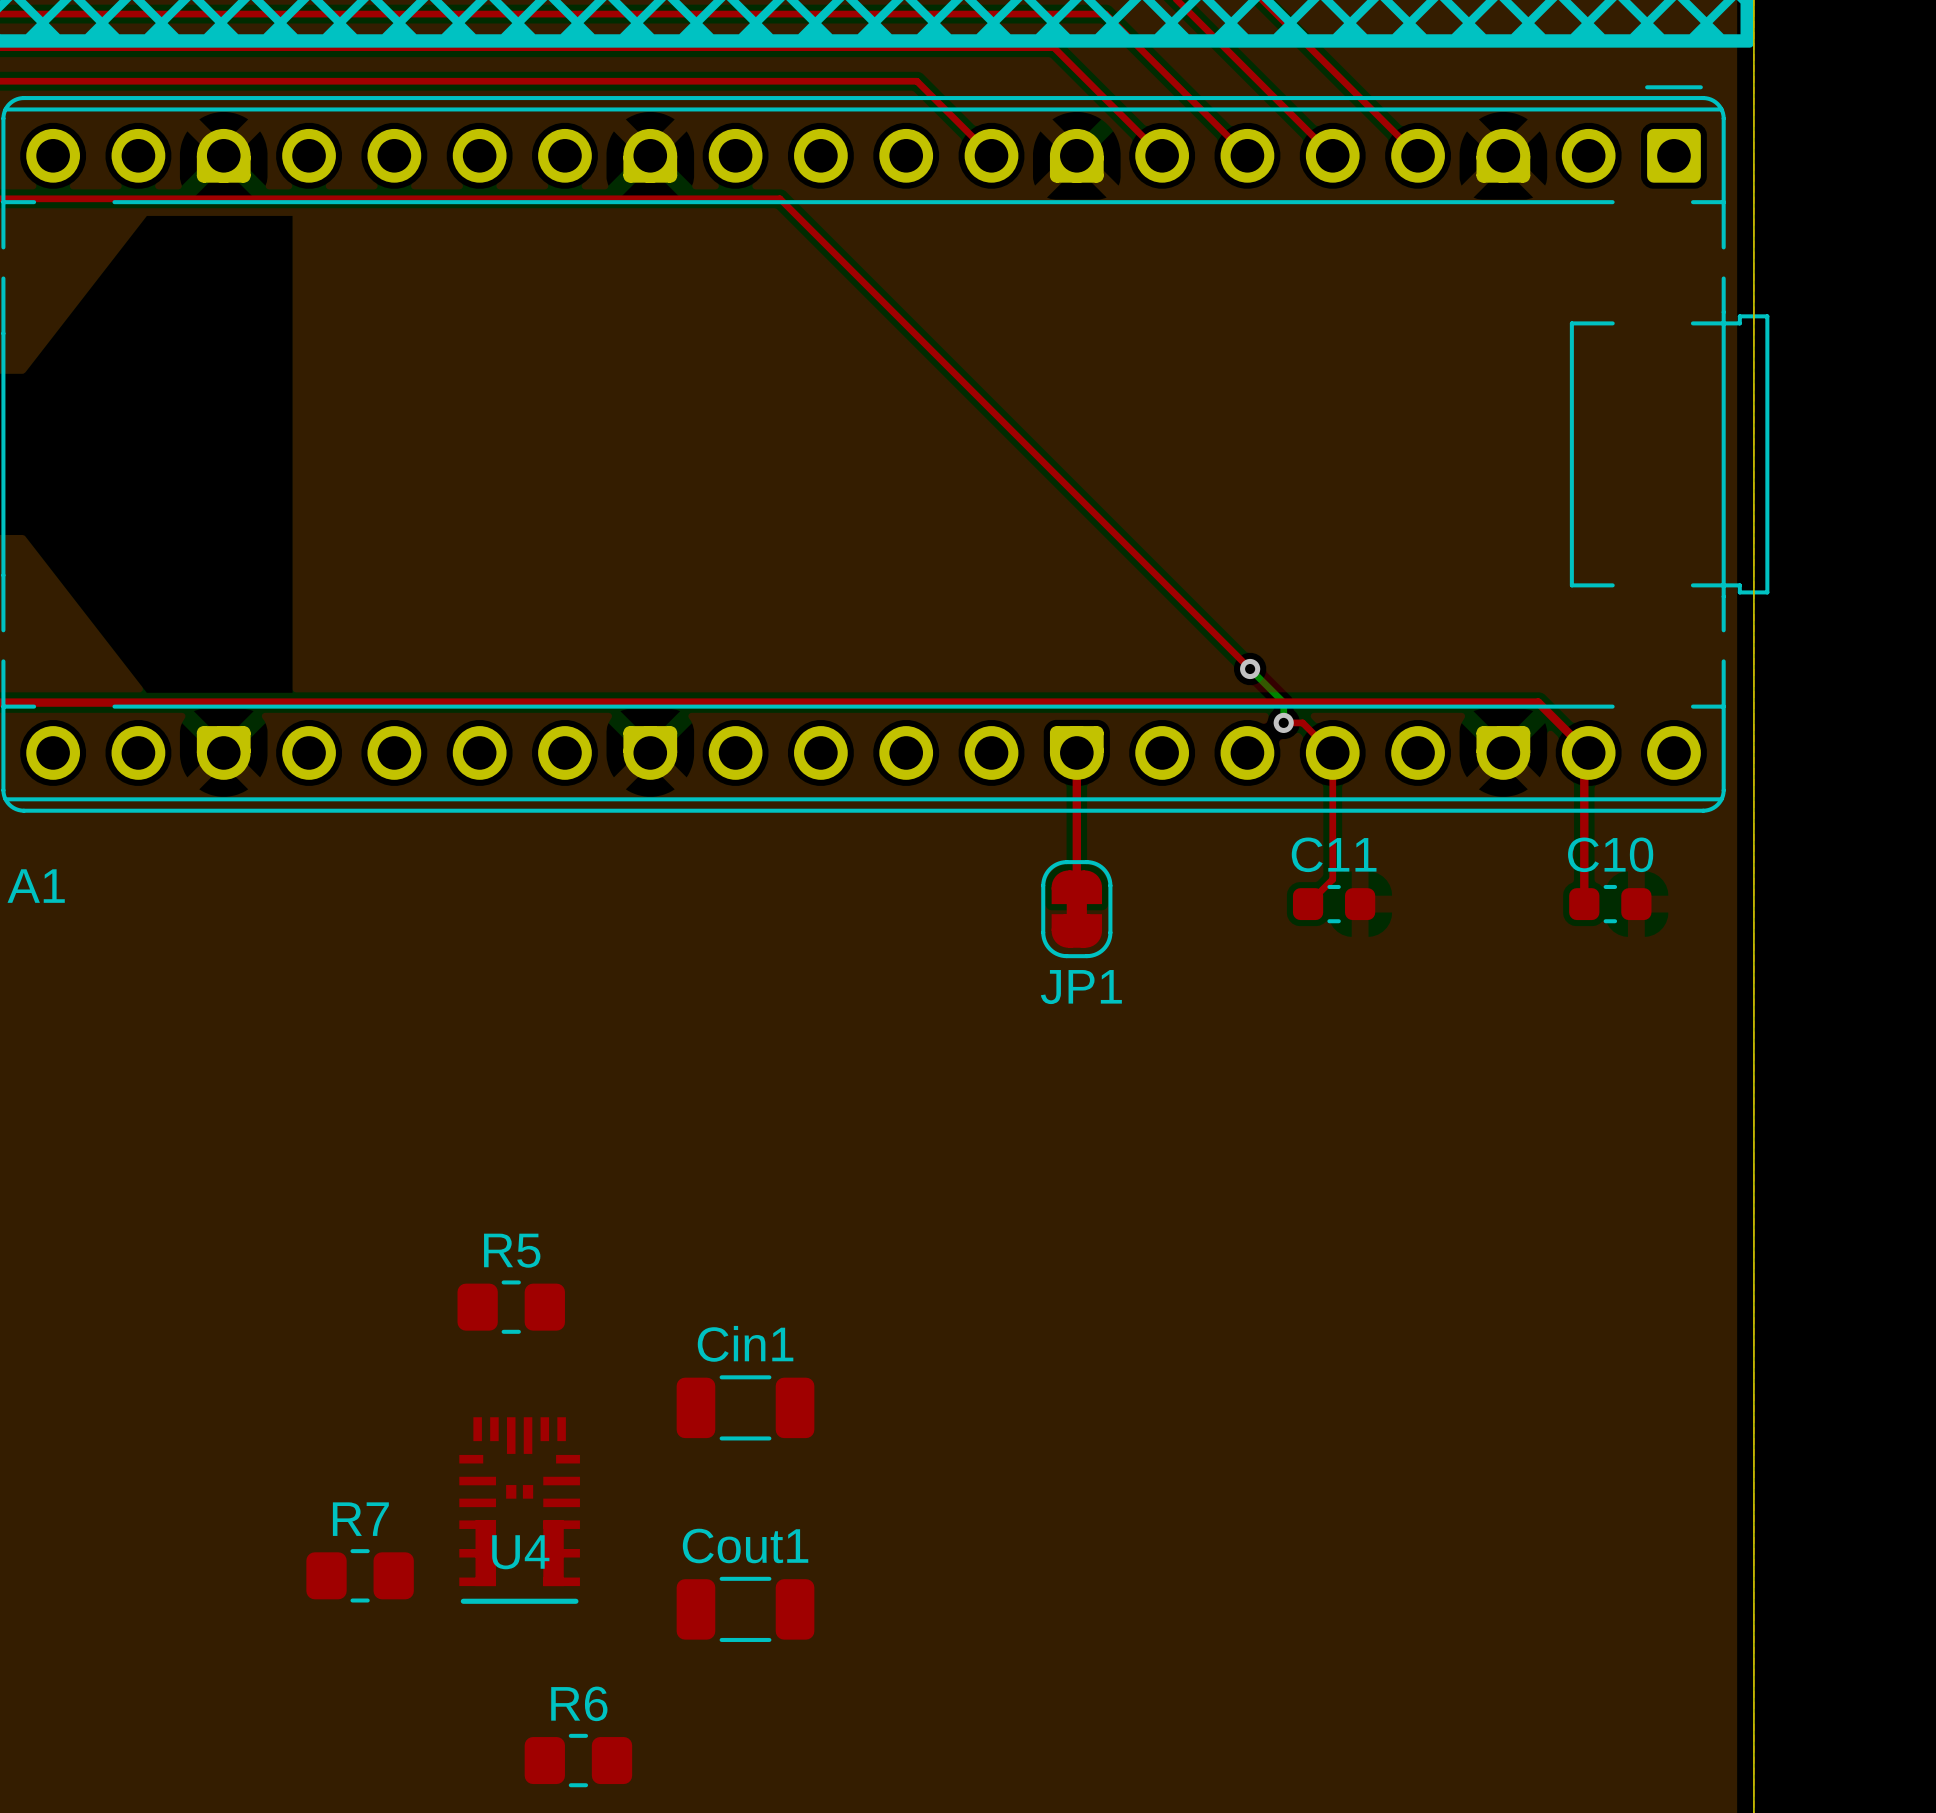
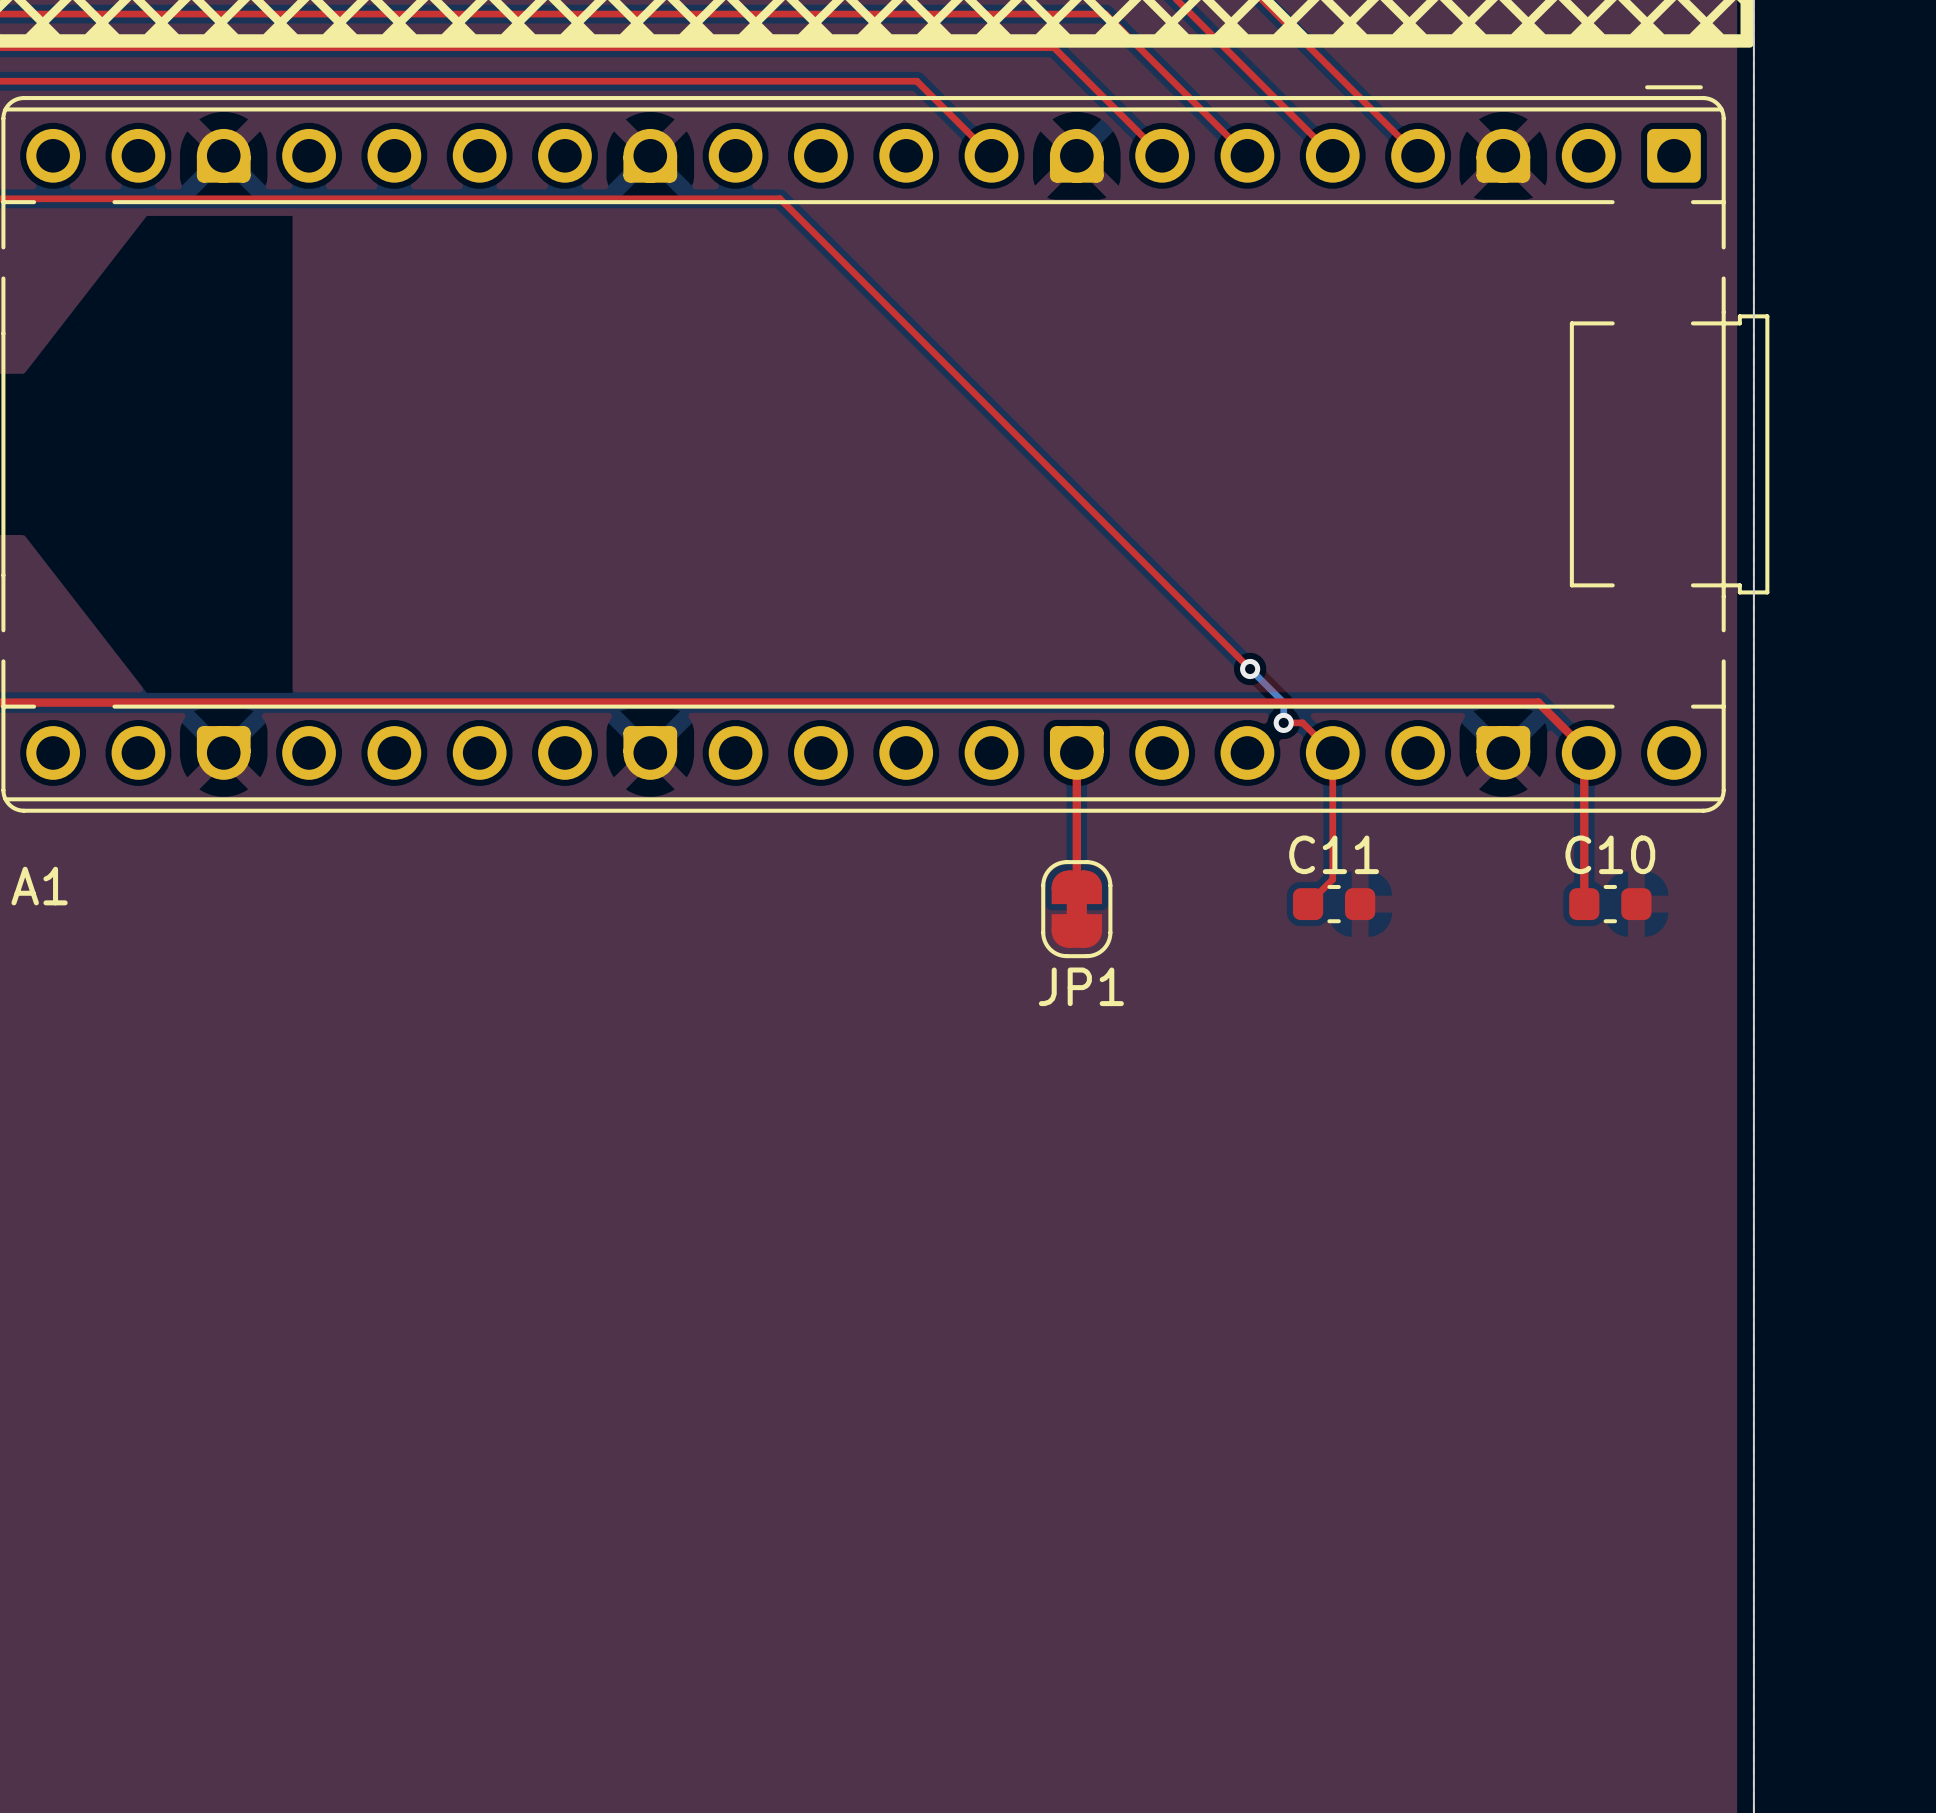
R5: (511, 1307) -> none
Cin1: (745, 1407) -> none
U4: (519, 1510) -> none
R7: (360, 1575) -> none
Cout1: (745, 1609) -> none
R6: (578, 1760) -> none

